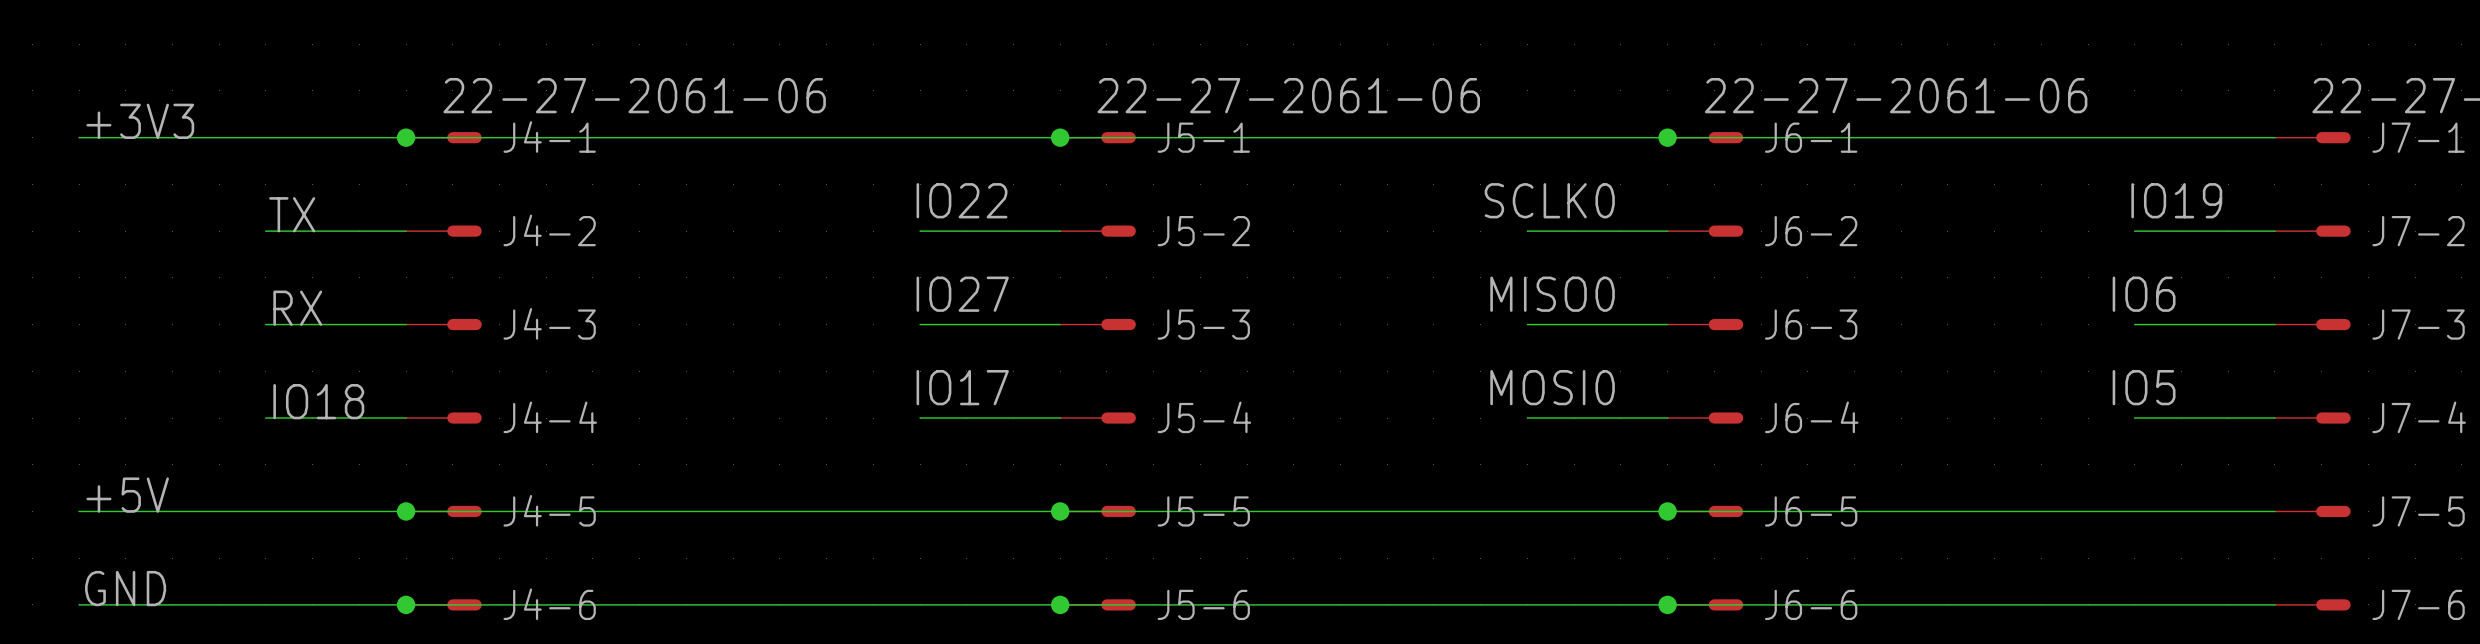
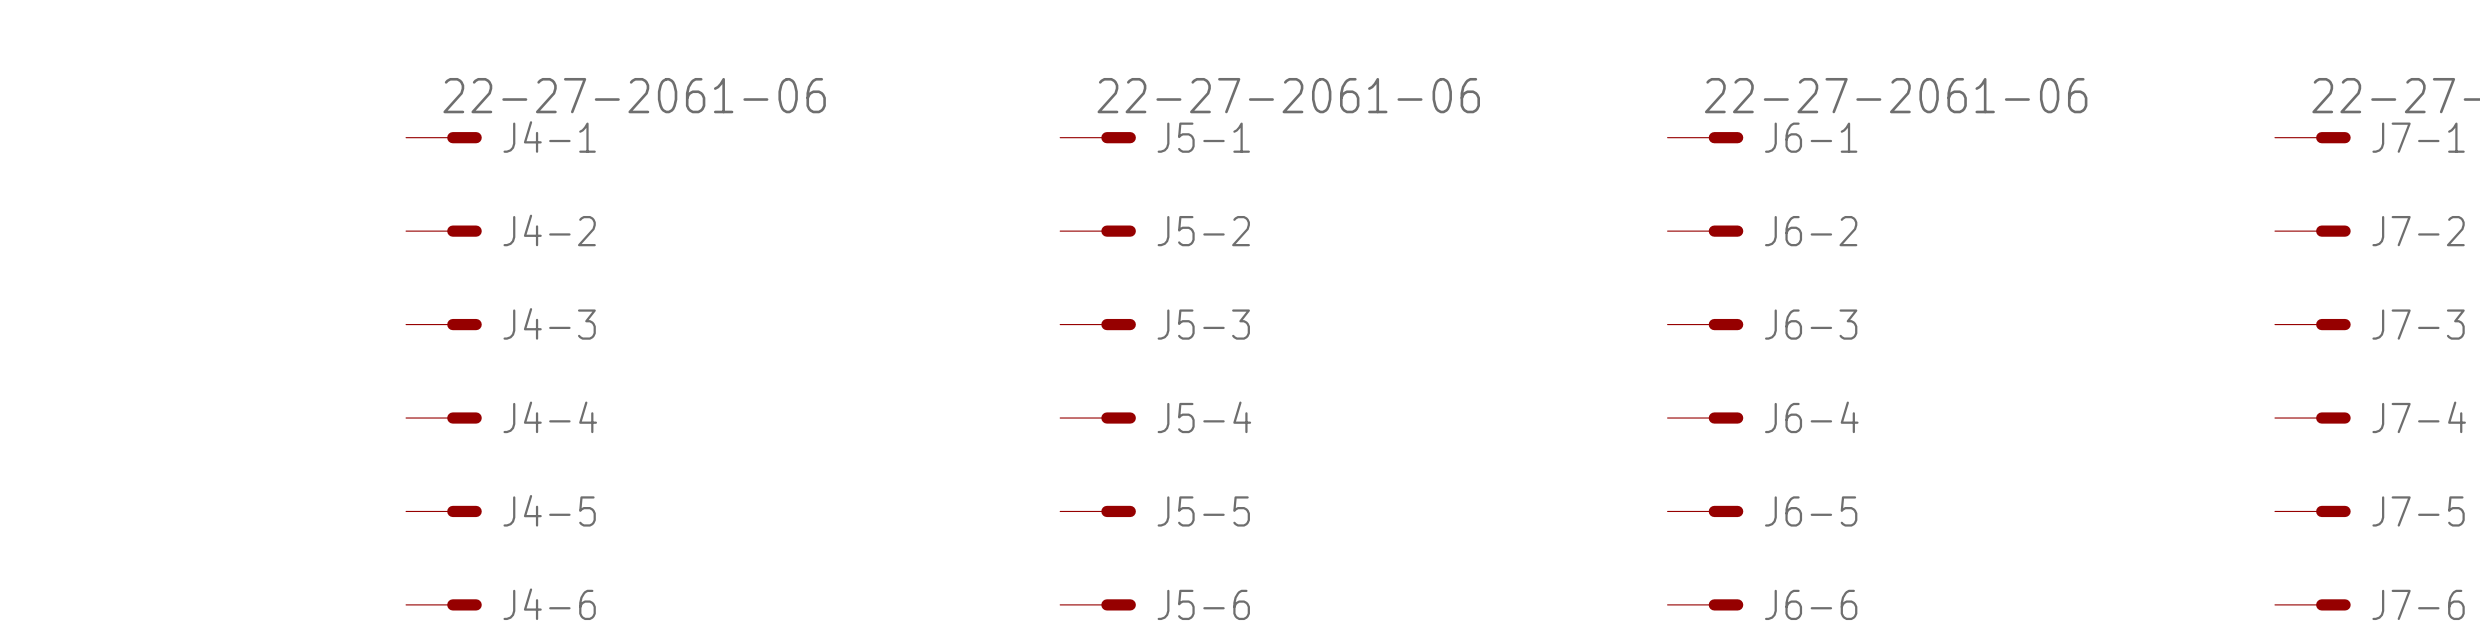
label: +3V3 (140, 121) -> none
wire: (79, 137) (2274, 137) -> none
junction: (406, 137) -> none
junction: (1060, 137) -> none
junction: (1667, 137) -> none
label: IO22 (961, 200) -> none
label: SCLK0 (1549, 200) -> none
label: IO19 (2176, 200) -> none
label: TX (292, 214) -> none
wire: (265, 231) (406, 231) -> none
wire: (920, 231) (1060, 231) -> none
wire: (1527, 231) (1667, 231) -> none
wire: (2134, 231) (2274, 231) -> none
label: IO27 (962, 294) -> none
label: MISO0 (1552, 294) -> none
label: IO6 (2144, 294) -> none
label: RX (297, 308) -> none
wire: (265, 324) (406, 324) -> none
wire: (920, 324) (1060, 324) -> none
wire: (1527, 324) (1667, 324) -> none
wire: (2134, 324) (2274, 324) -> none
label: IO17 (962, 387) -> none
label: MOSI0 (1552, 387) -> none
label: IO5 (2144, 387) -> none
label: IO18 (318, 401) -> none
wire: (265, 418) (406, 418) -> none
wire: (920, 418) (1060, 418) -> none
wire: (1527, 418) (1667, 418) -> none
wire: (2134, 418) (2274, 418) -> none
label: +5V (127, 495) -> none
wire: (79, 511) (2274, 511) -> none
junction: (406, 511) -> none
junction: (1060, 511) -> none
junction: (1667, 511) -> none
label: GND (125, 588) -> none
wire: (79, 604) (2274, 604) -> none
junction: (406, 604) -> none
junction: (1060, 604) -> none
junction: (1667, 604) -> none

